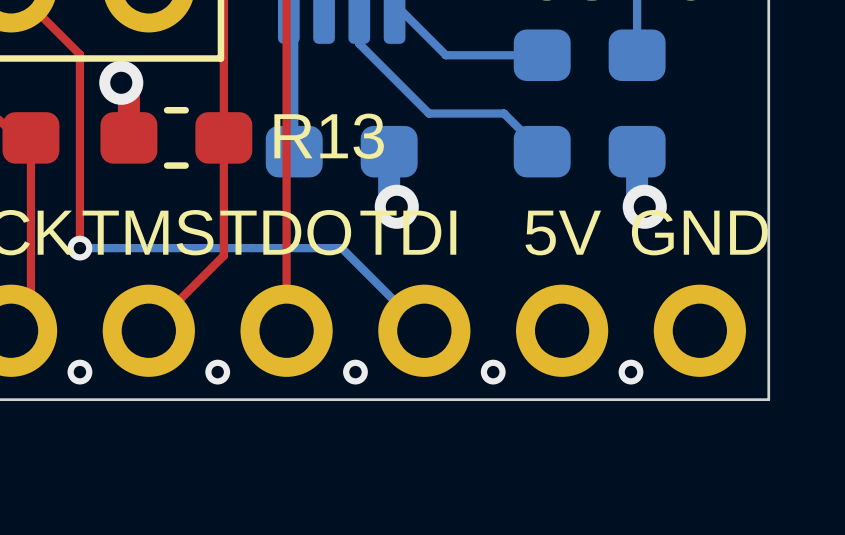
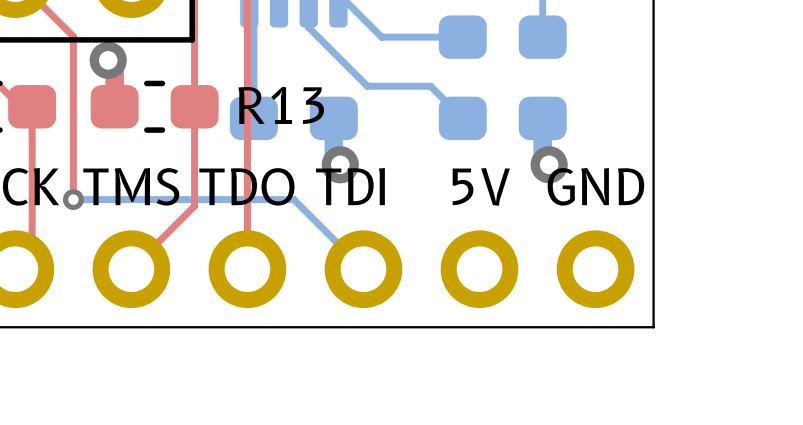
via: (79, 372) -> none
via: (217, 372) -> none
via: (355, 372) -> none
via: (493, 372) -> none
via: (630, 372) -> none

